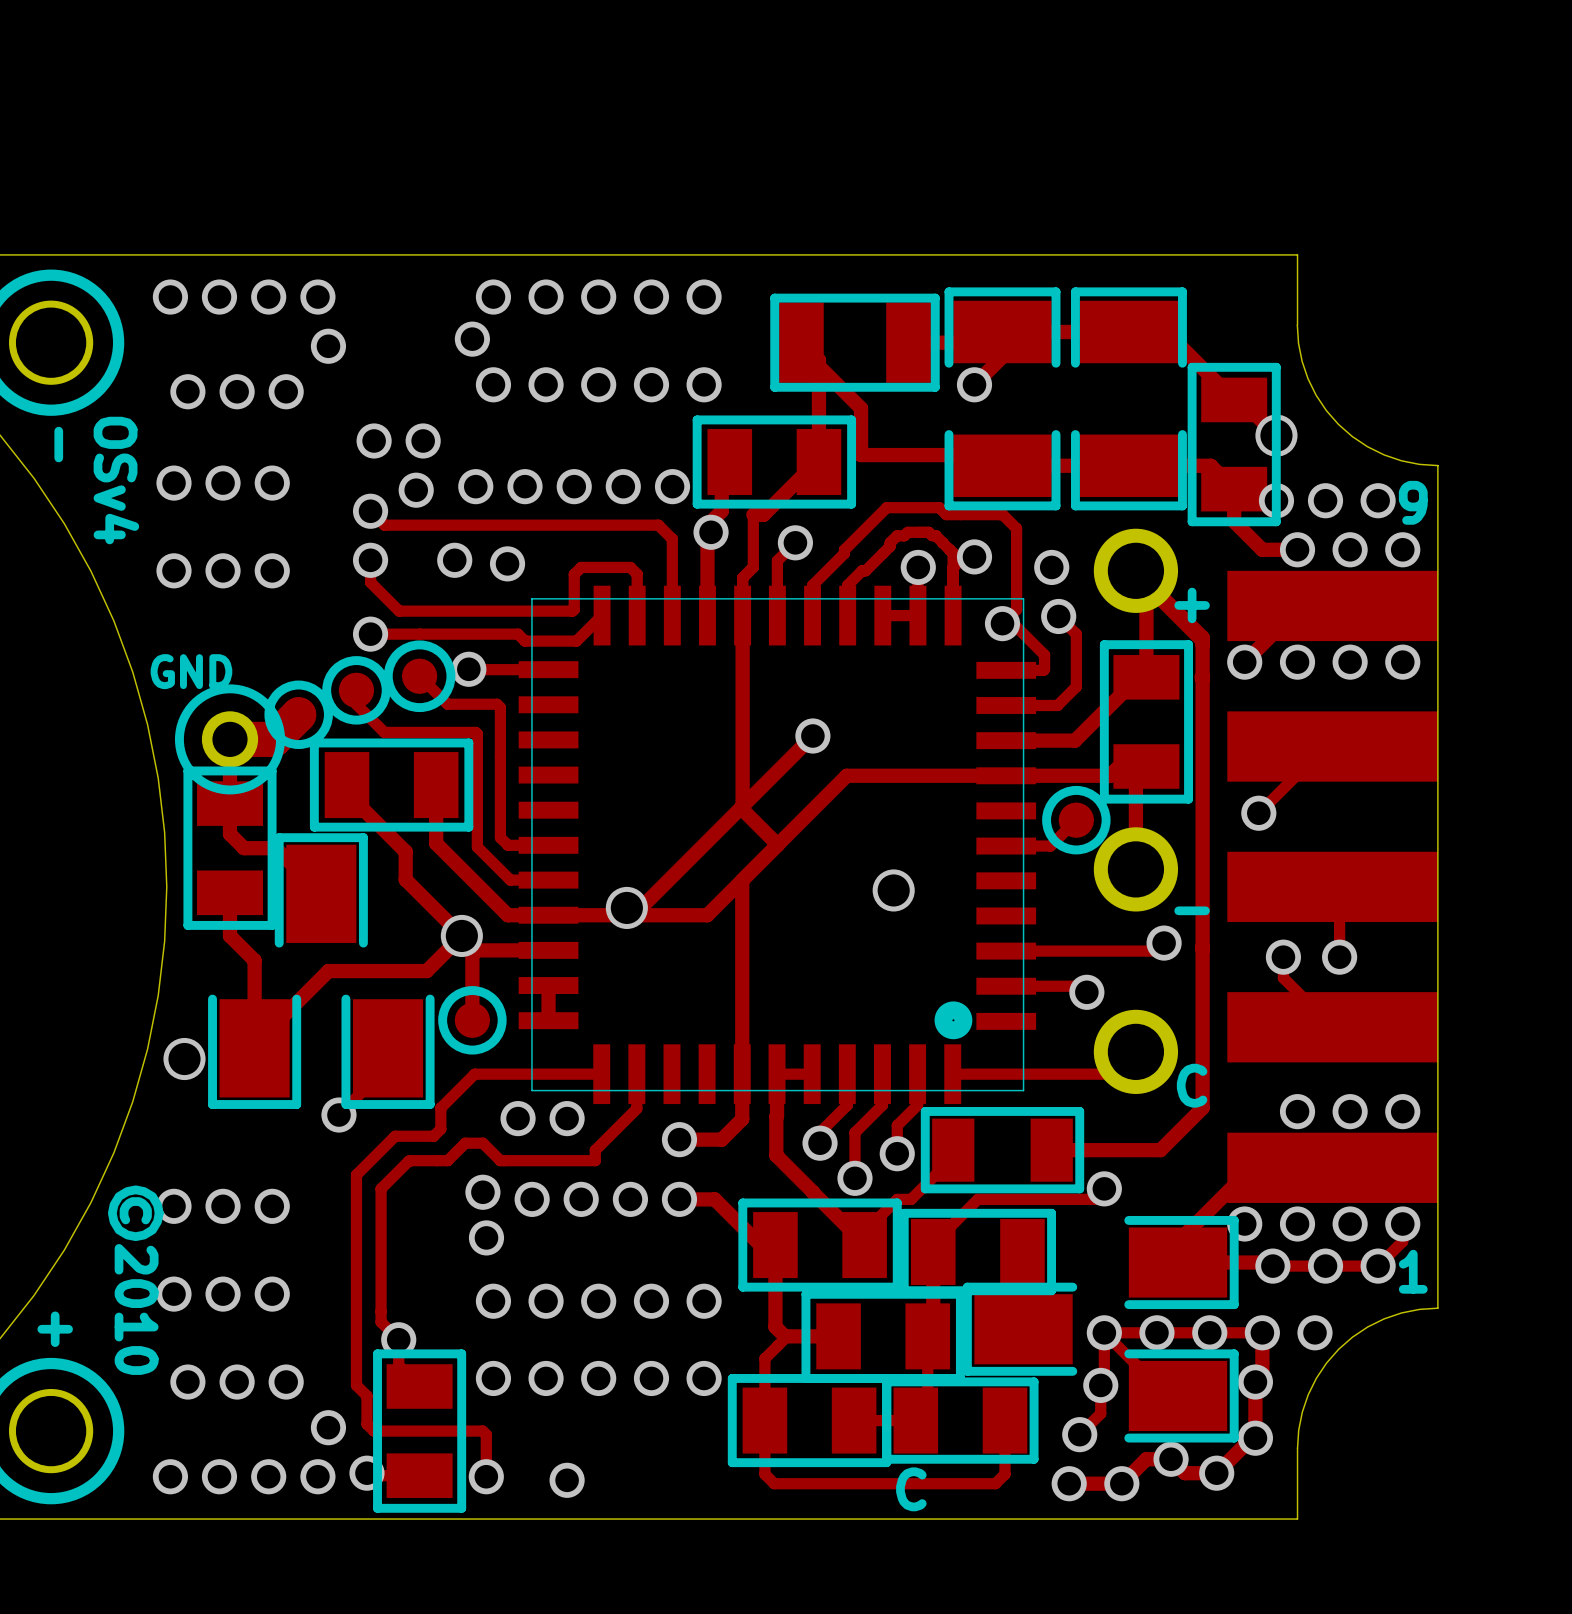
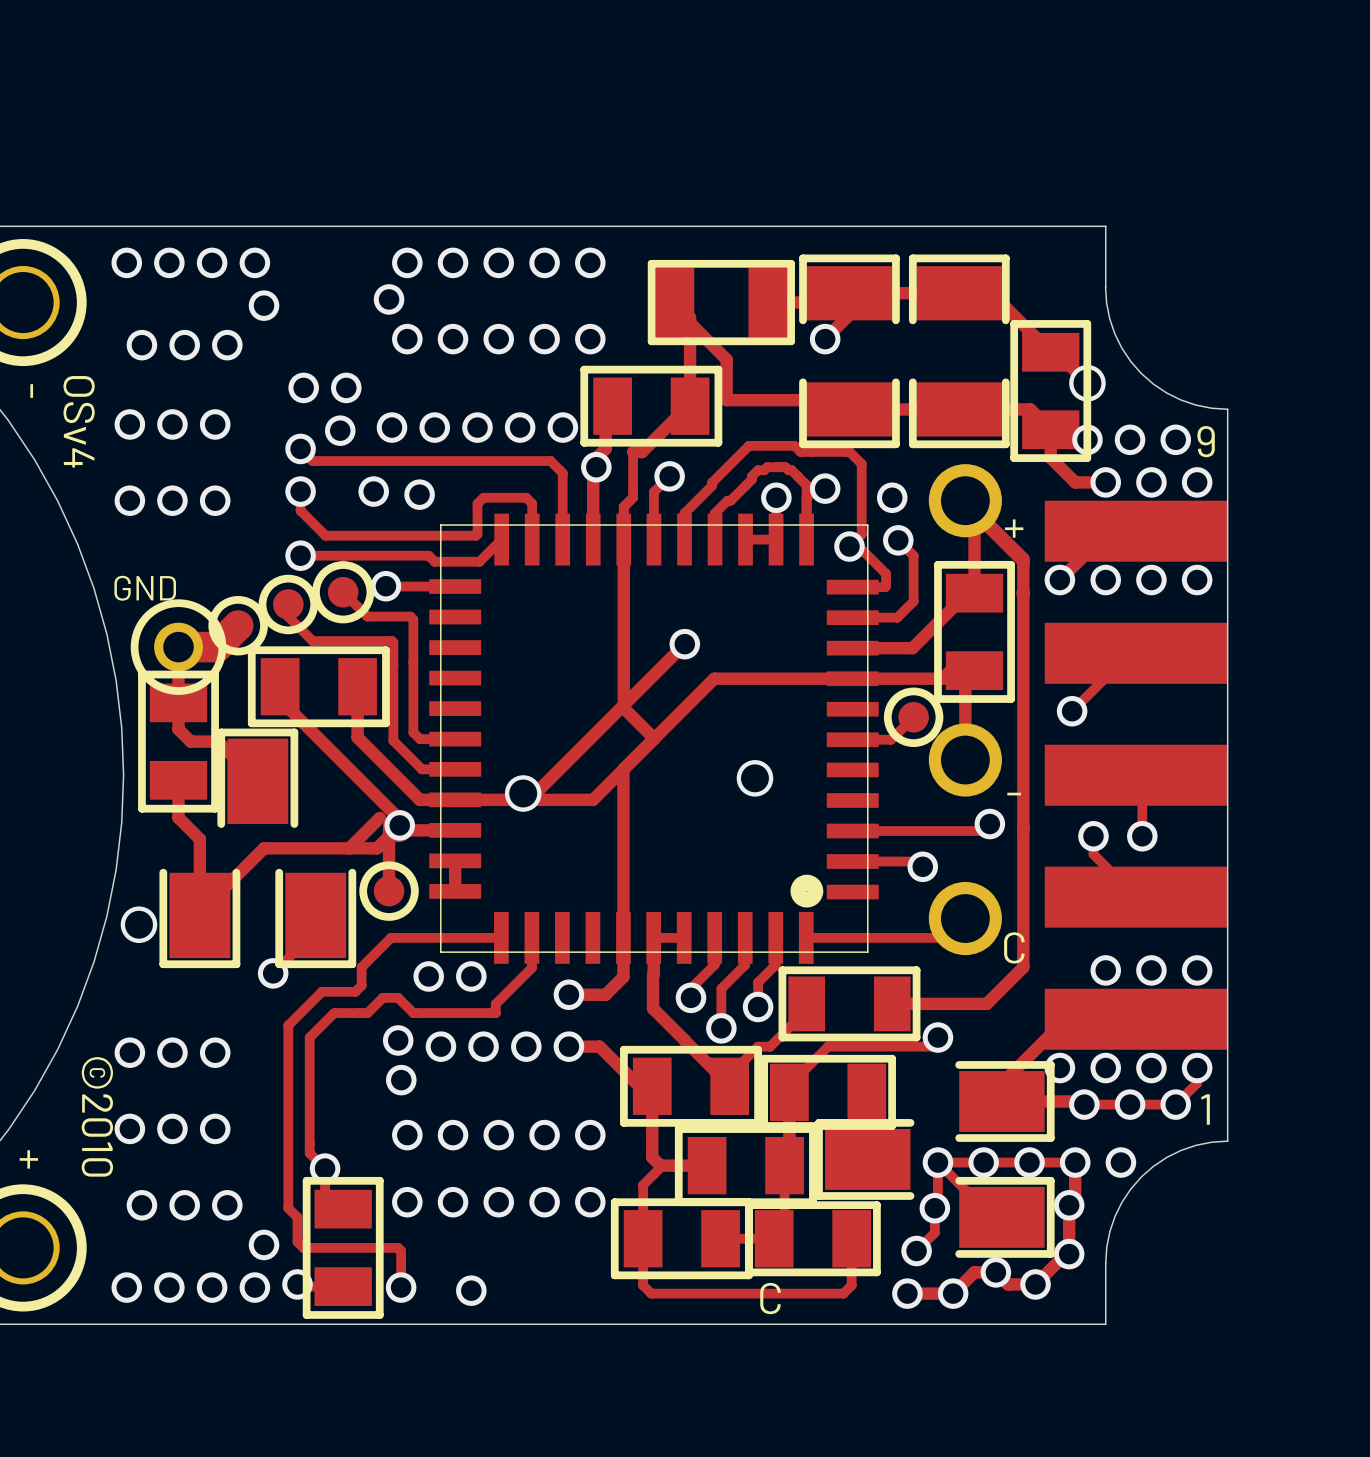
track: (347, 793) (405, 851) (405, 879) (476, 950) (486, 950) -> (280, 693) (280, 699) (399, 819) (399, 825) (376, 848) (349, 848)
via position: (461, 935) -> (399, 825)

